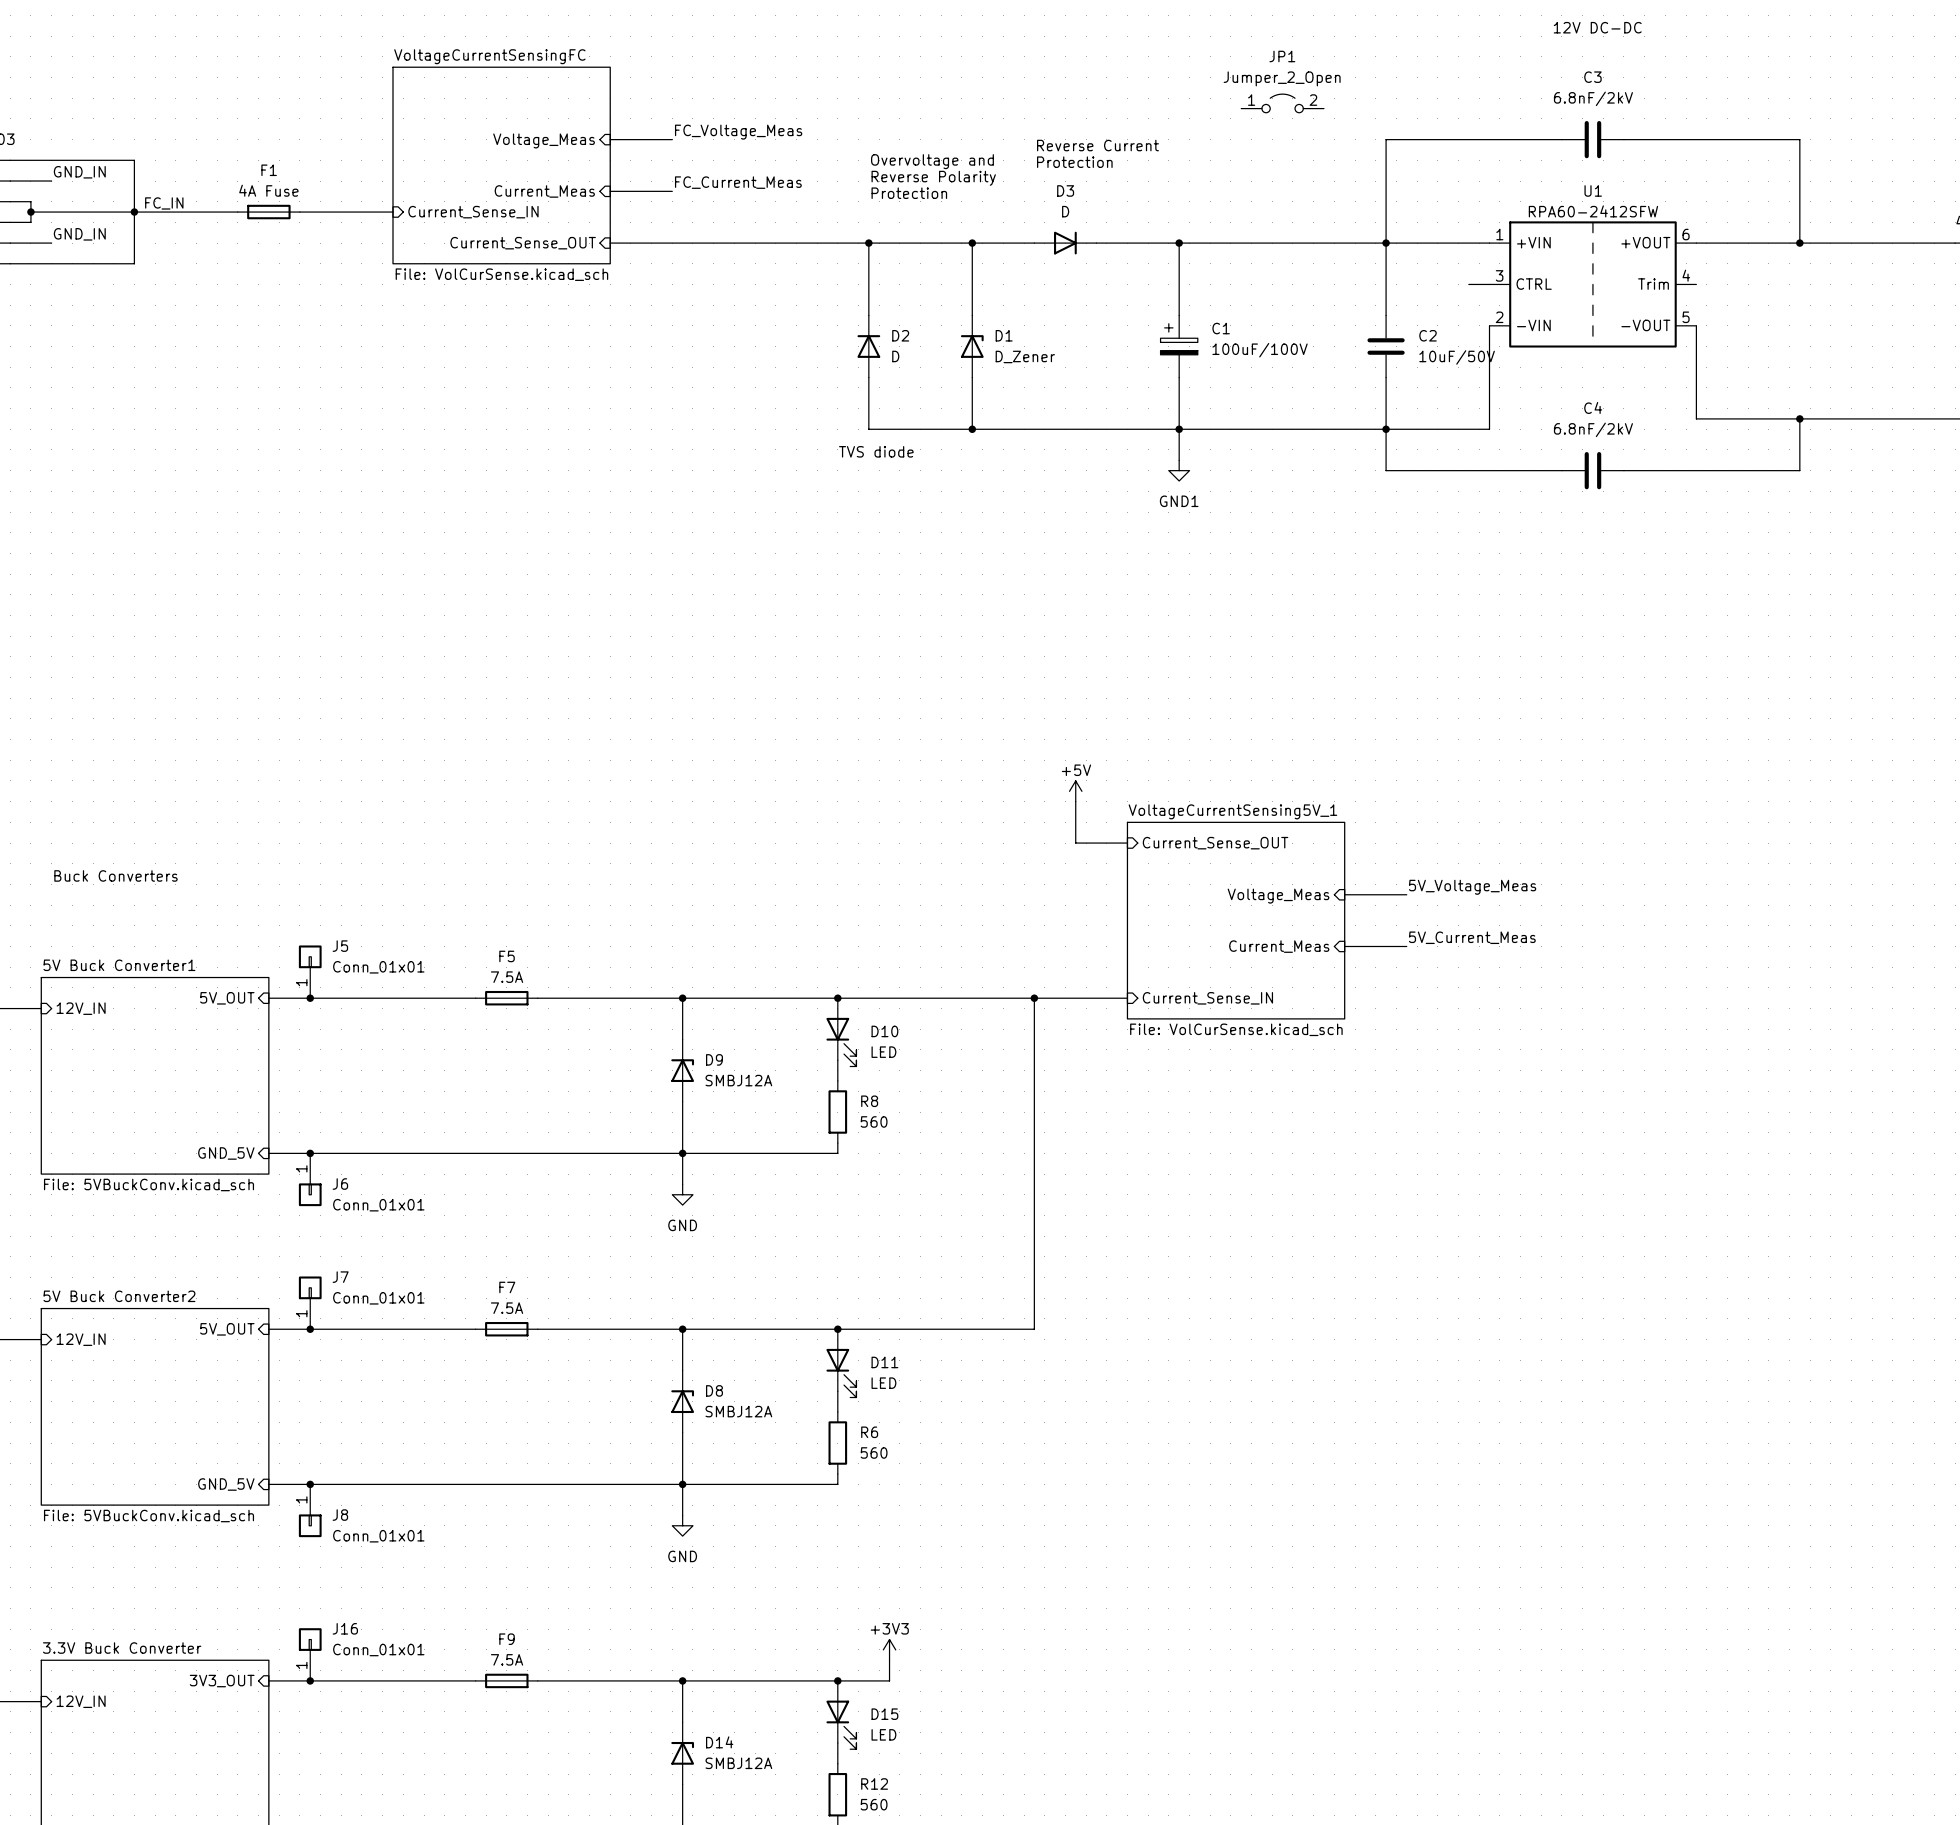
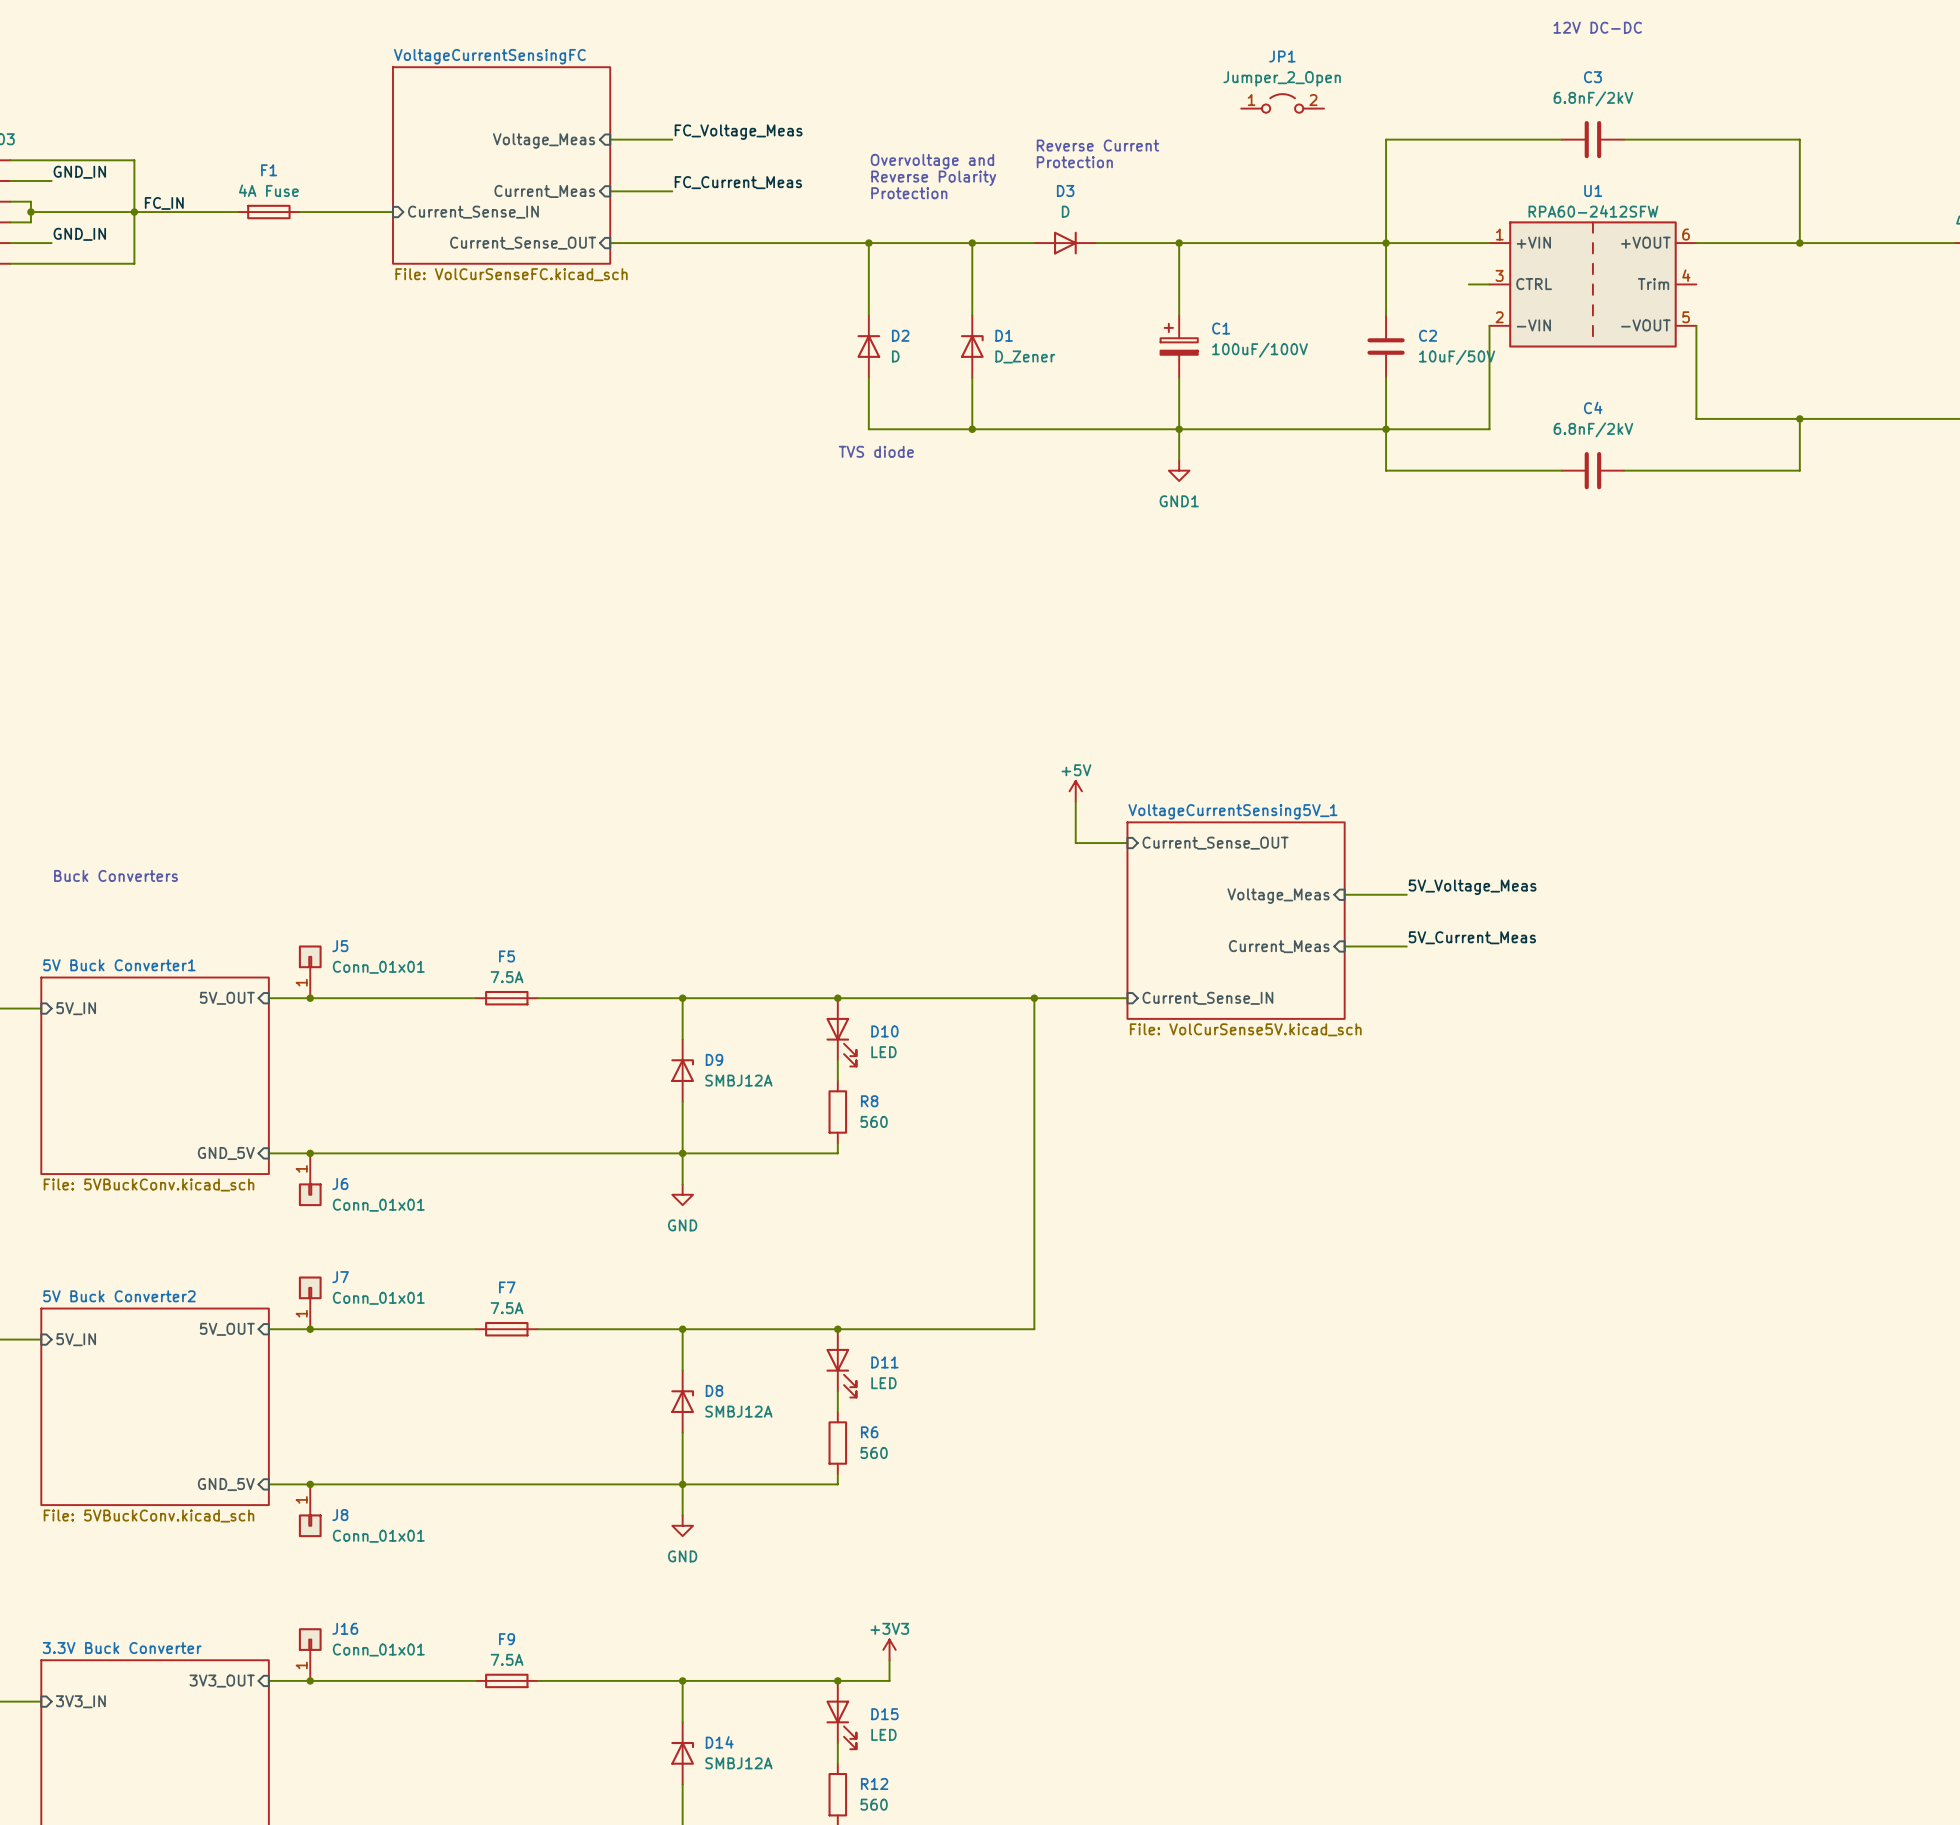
sheet VoltageCurrentSensingFC value: File: VolCurSense.kicad_sch (501, 274) -> File: VolCurSenseFC.kicad_sch (511, 274)
sheet pin: 12V_IN (81, 1008) -> 5V_IN (76, 1008)
sheet VoltageCurrentSensing5V_1 value: File: VolCurSense.kicad_sch (1236, 1029) -> File: VolCurSense5V.kicad_sch (1245, 1029)
sheet pin: 12V_IN (81, 1339) -> 5V_IN (76, 1339)
sheet pin: 12V_IN (81, 1701) -> 3V3_IN (80, 1701)

